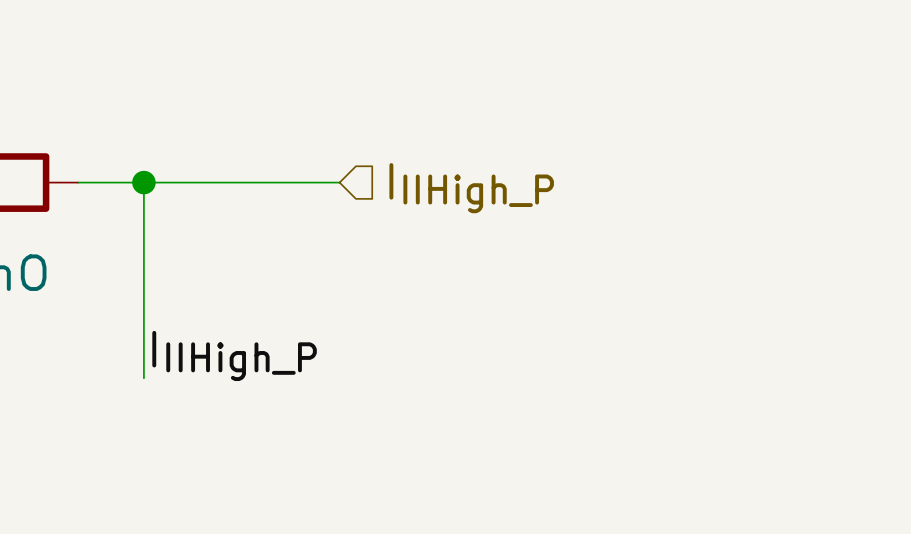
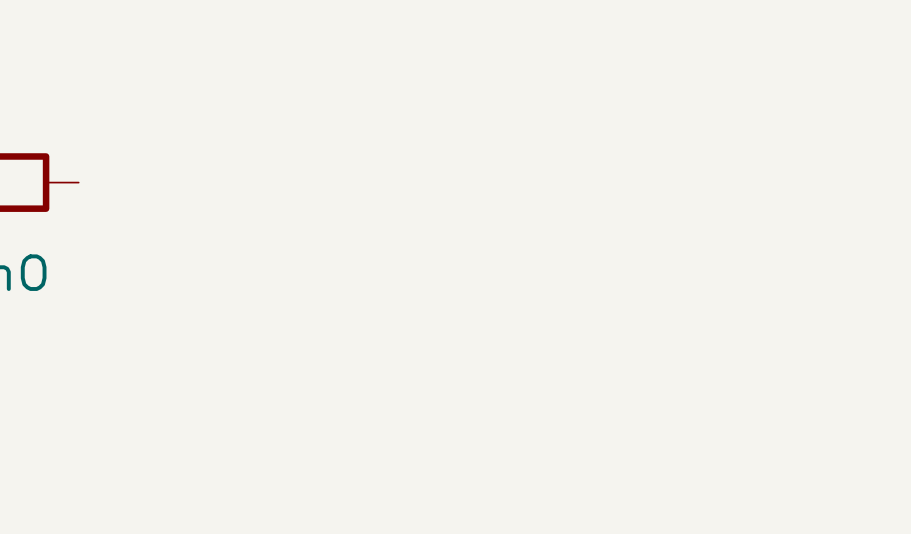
wire: (78, 182) (339, 182) -> none
wire: (143, 182) (143, 378) -> none
junction: (143, 182) -> none
hierarchical label: IIIHigh_P (471, 188) -> none
label: IIIHigh_P (234, 355) -> none

